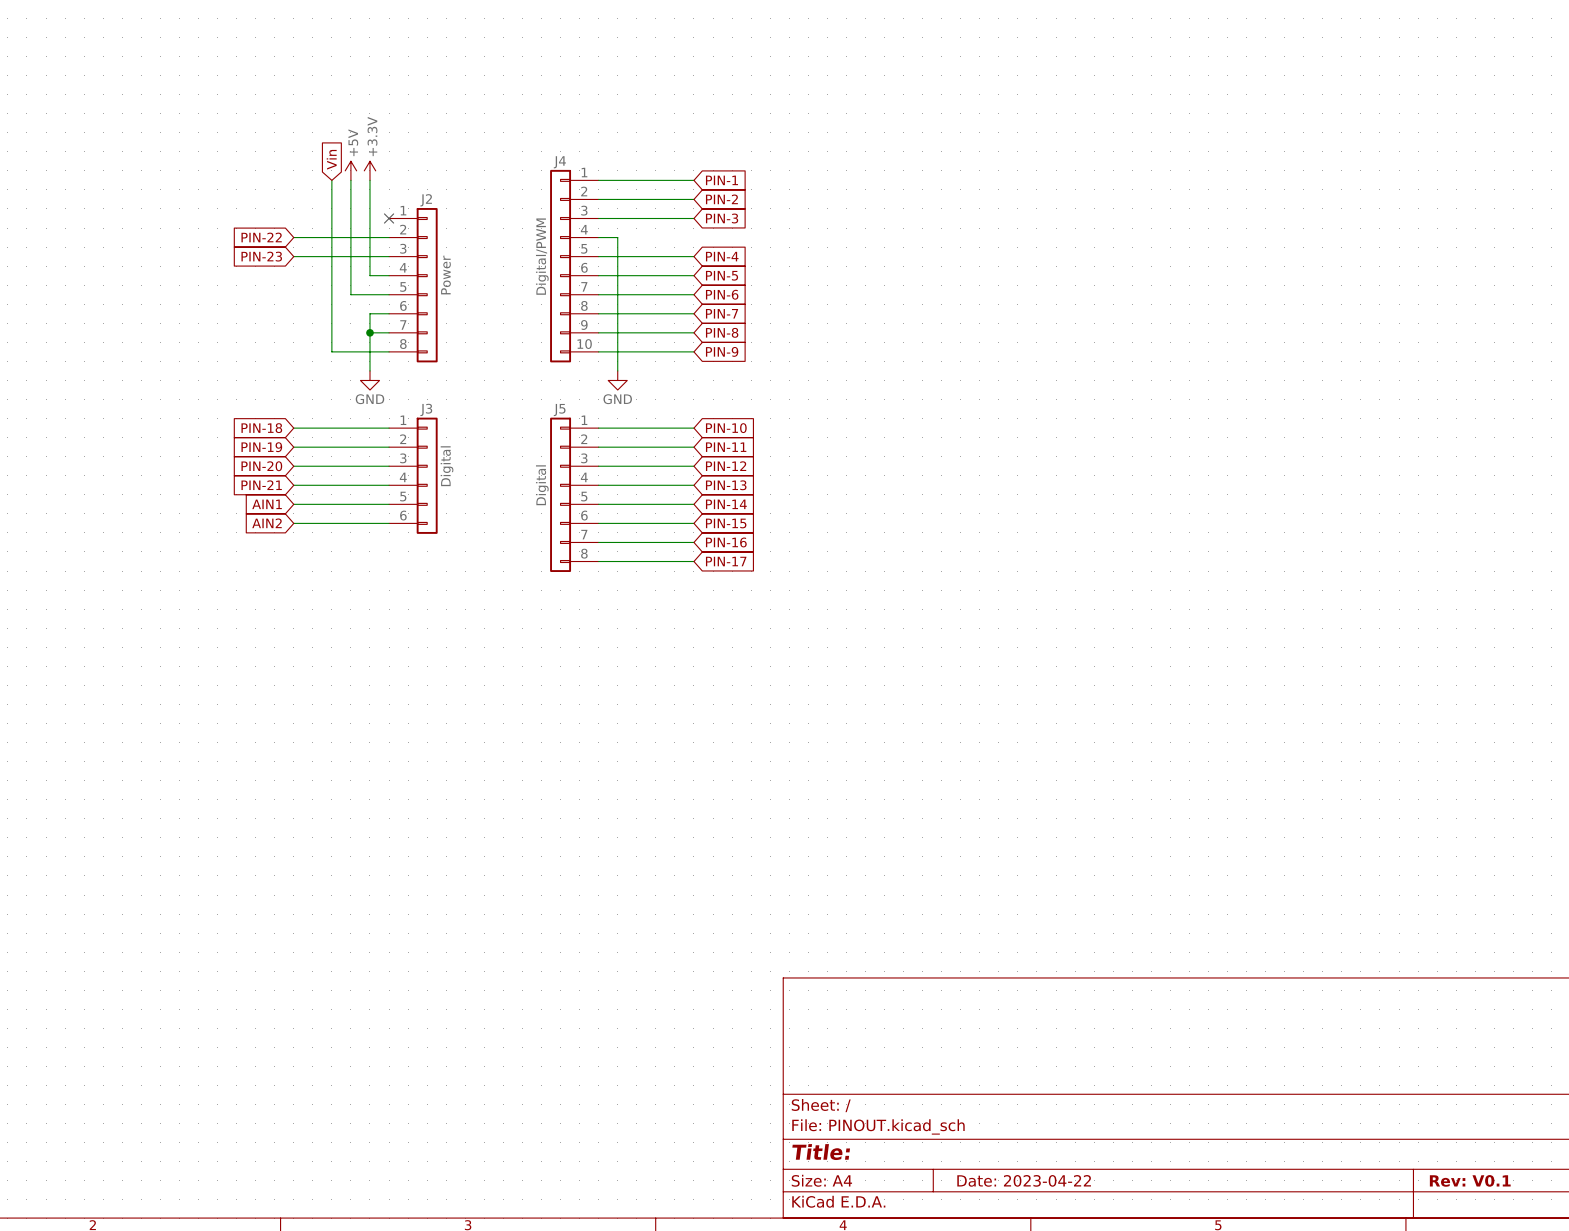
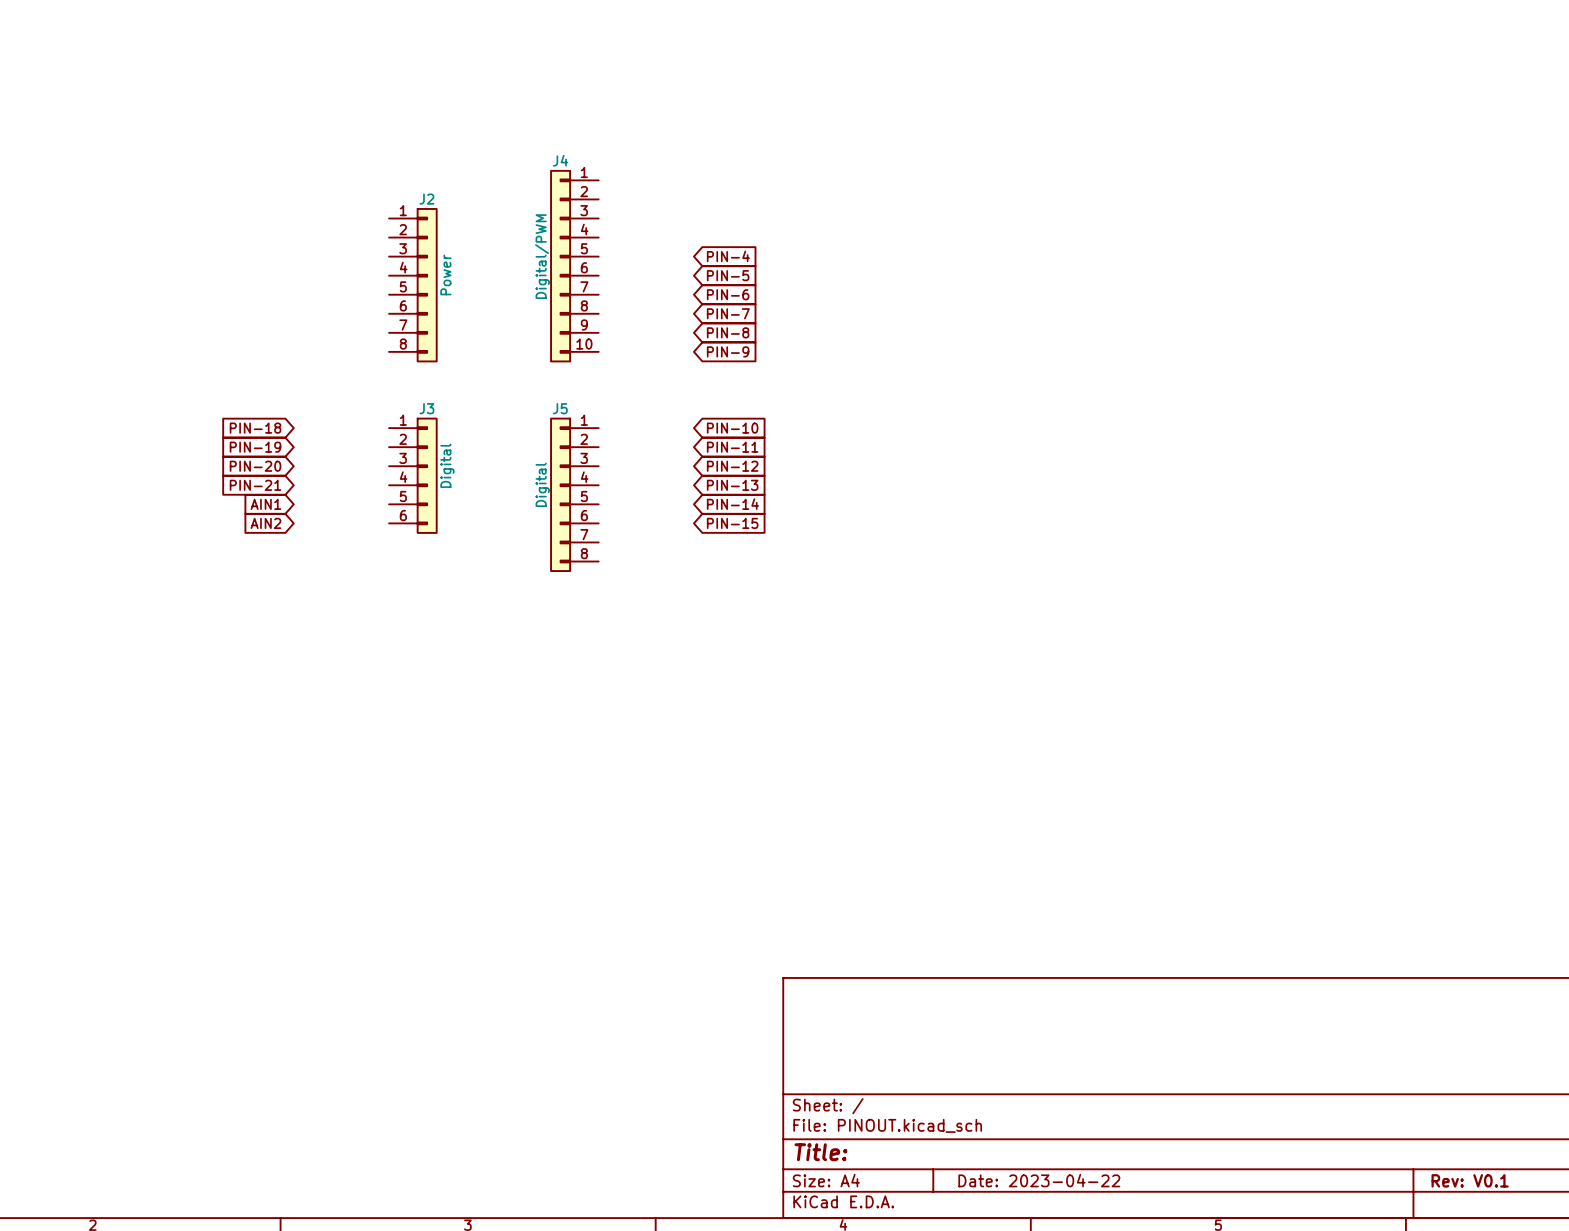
global label: Vin (331, 159) -> none
power symbol: +5V (350, 170) -> none
power symbol: +3.3V (369, 170) -> none
wire: (331, 180) (331, 351) (389, 351) -> none
wire: (350, 180) (350, 294) (389, 294) -> none
wire: (369, 180) (369, 275) (389, 275) -> none
wire: (598, 180) (693, 180) -> none
global label: PIN-1 (721, 180) -> none
wire: (598, 199) (693, 199) -> none
global label: PIN-2 (721, 199) -> none
no-connect mark: (389, 218) -> none
wire: (598, 218) (693, 218) -> none
global label: PIN-3 (722, 218) -> none
global label: PIN-22 (261, 237) -> none
wire: (293, 237) (389, 237) -> none
wire: (598, 237) (617, 237) (617, 370) -> none
global label: PIN-23 (261, 256) -> none
wire: (293, 256) (389, 256) -> none
wire: (598, 256) (693, 256) -> none
wire: (598, 275) (693, 275) -> none
wire: (598, 294) (693, 294) -> none
wire: (389, 313) (369, 313) (369, 370) -> none
wire: (598, 313) (693, 313) -> none
wire: (369, 332) (389, 332) -> none
junction: (369, 332) -> none
wire: (598, 332) (693, 332) -> none
wire: (598, 351) (693, 351) -> none
power symbol: GND (369, 380) -> none
power symbol: GND (617, 380) -> none
wire: (293, 428) (389, 428) -> none
wire: (598, 428) (693, 428) -> none
wire: (293, 447) (389, 447) -> none
wire: (598, 447) (693, 447) -> none
wire: (293, 466) (389, 466) -> none
wire: (598, 466) (693, 466) -> none
wire: (293, 485) (389, 485) -> none
wire: (598, 485) (693, 485) -> none
wire: (293, 504) (389, 504) -> none
wire: (598, 504) (693, 504) -> none
wire: (293, 523) (389, 523) -> none
wire: (598, 523) (693, 523) -> none
wire: (598, 542) (693, 542) -> none
global label: PIN-16 (726, 542) -> none
wire: (598, 561) (693, 561) -> none
global label: PIN-17 (726, 561) -> none

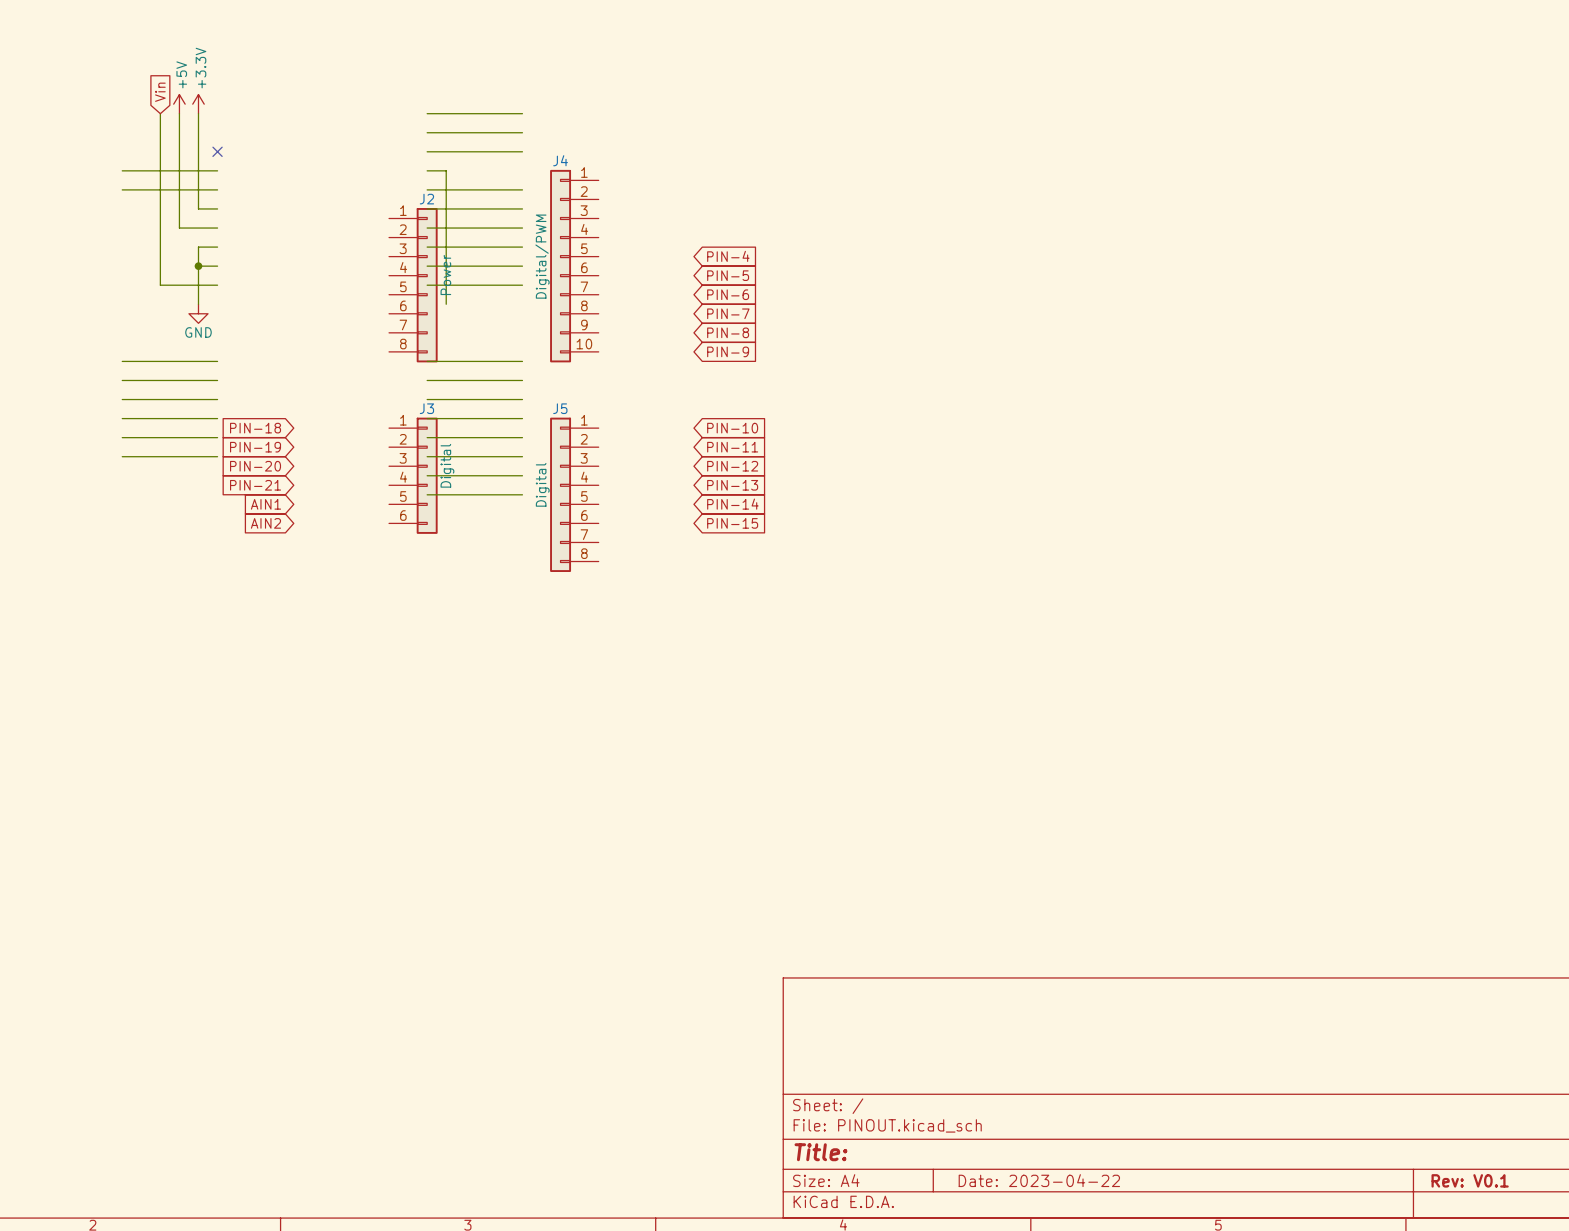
global label: none -> Vin (160, 92)
power symbol: none -> +5V (179, 104)
power symbol: none -> +3.3V (198, 104)
wire: none -> (160, 113) (160, 285) (217, 285)
wire: none -> (179, 113) (179, 228) (217, 228)
wire: none -> (198, 113) (198, 208) (217, 208)
wire: none -> (427, 113) (522, 113)
wire: none -> (427, 132) (522, 132)
no-connect mark: none -> (217, 151)
wire: none -> (427, 151) (522, 151)
wire: none -> (122, 170) (217, 170)
wire: none -> (427, 170) (446, 170) (446, 304)
wire: none -> (122, 189) (217, 189)
wire: none -> (427, 189) (522, 189)
wire: none -> (427, 208) (522, 208)
wire: none -> (427, 228) (522, 228)
wire: none -> (217, 247) (198, 247) (198, 304)
wire: none -> (427, 247) (522, 247)
wire: none -> (198, 266) (217, 266)
junction: none -> (198, 266)
wire: none -> (427, 266) (522, 266)
wire: none -> (427, 285) (522, 285)
power symbol: none -> GND (198, 313)
wire: none -> (122, 361) (217, 361)
wire: none -> (427, 361) (522, 361)
wire: none -> (122, 380) (217, 380)
wire: none -> (427, 380) (522, 380)
wire: none -> (122, 399) (217, 399)
wire: none -> (427, 399) (522, 399)
wire: none -> (122, 418) (217, 418)
wire: none -> (427, 418) (522, 418)
wire: none -> (122, 437) (217, 437)
wire: none -> (427, 437) (522, 437)
wire: none -> (122, 456) (217, 456)
wire: none -> (427, 456) (522, 456)
wire: none -> (427, 475) (522, 475)
wire: none -> (427, 494) (522, 494)

